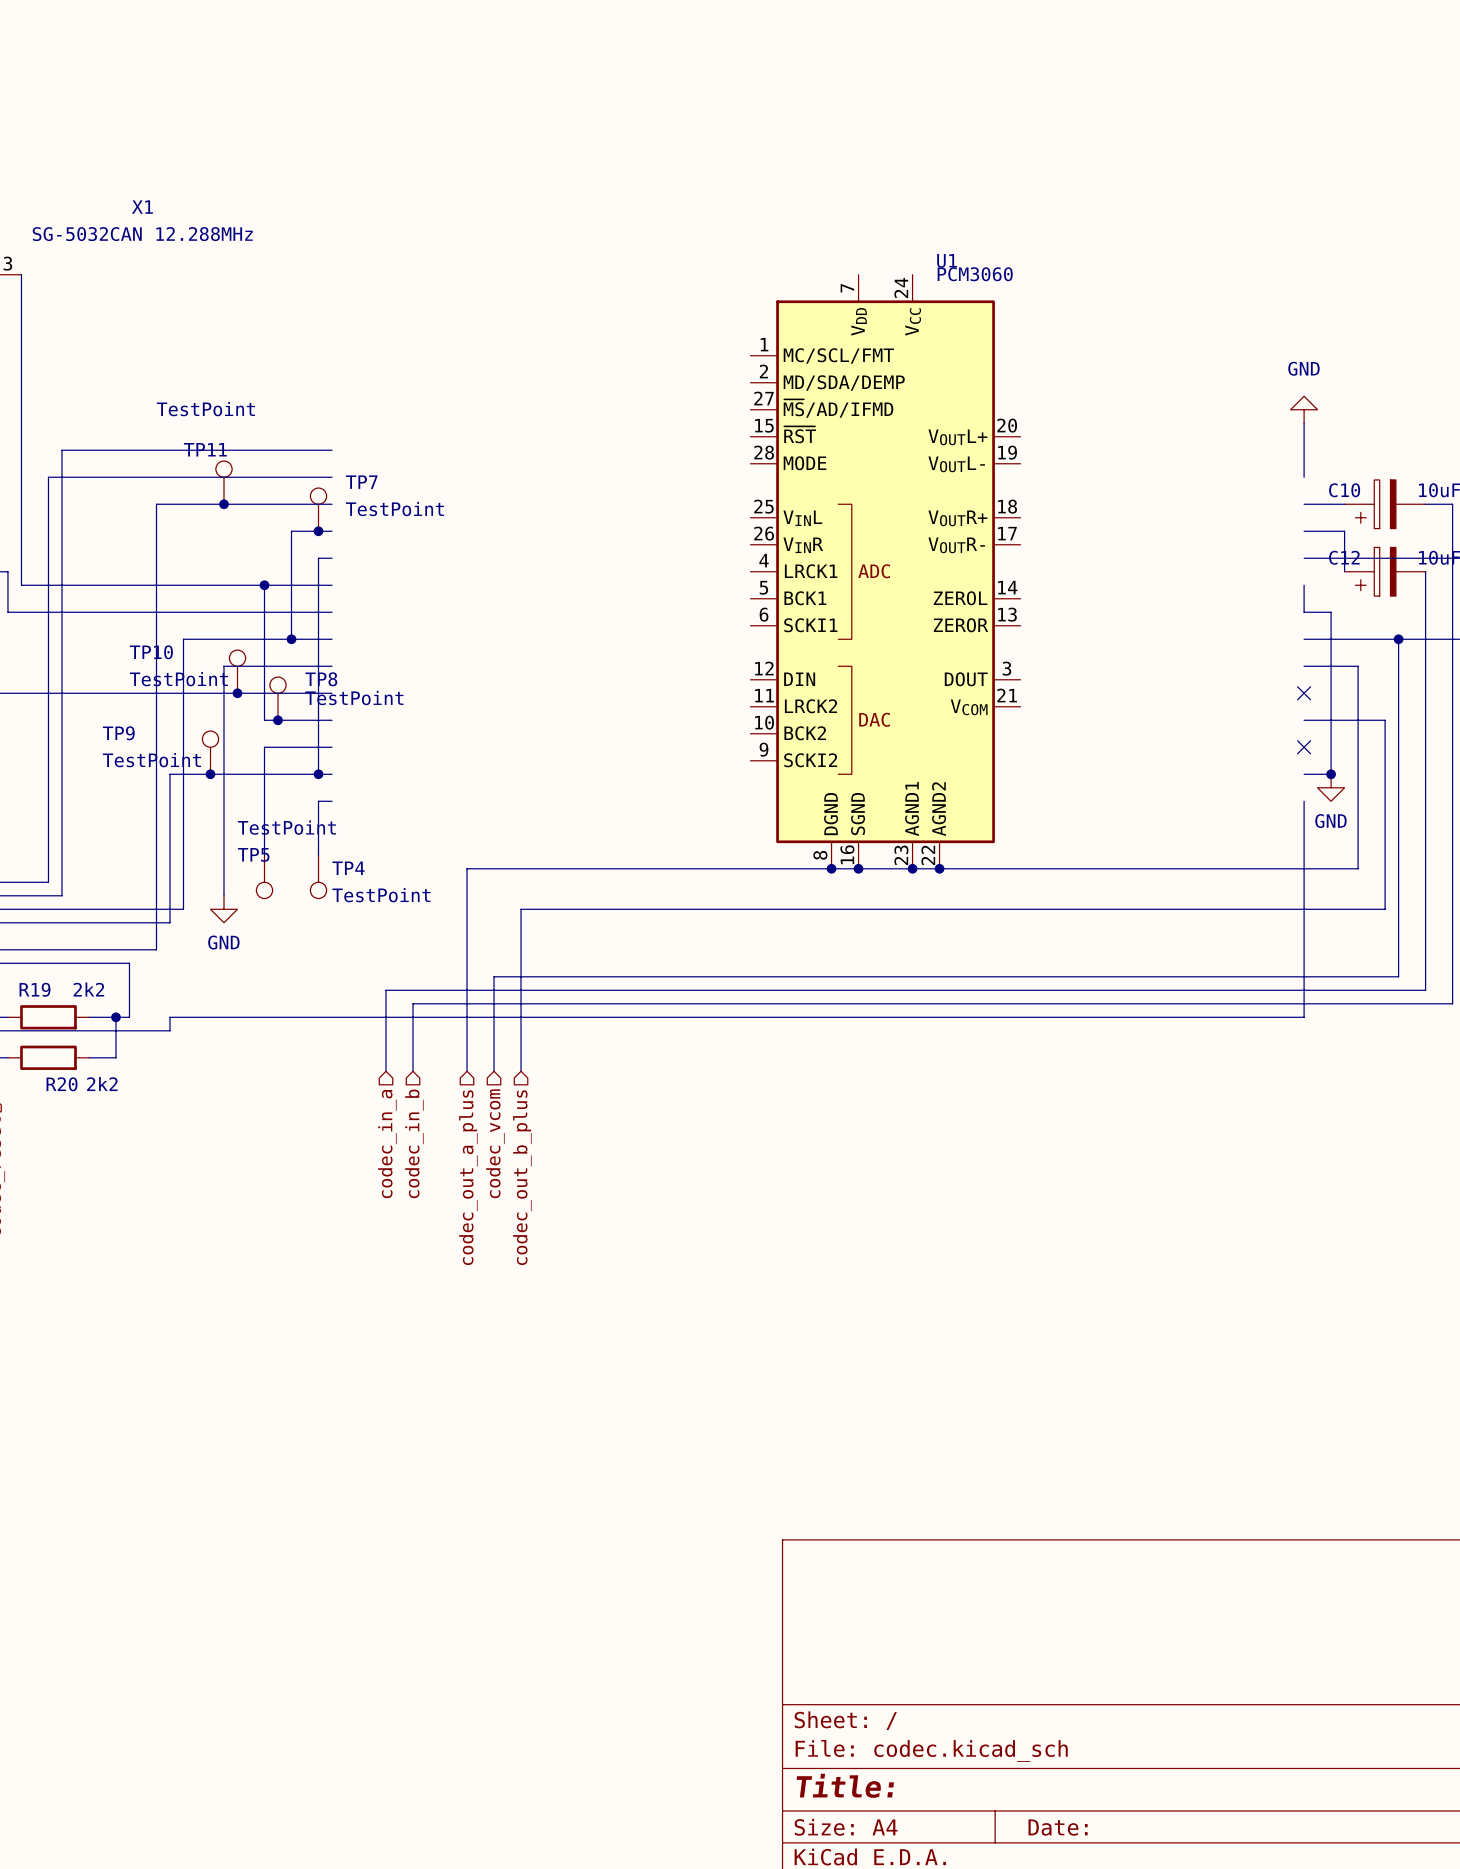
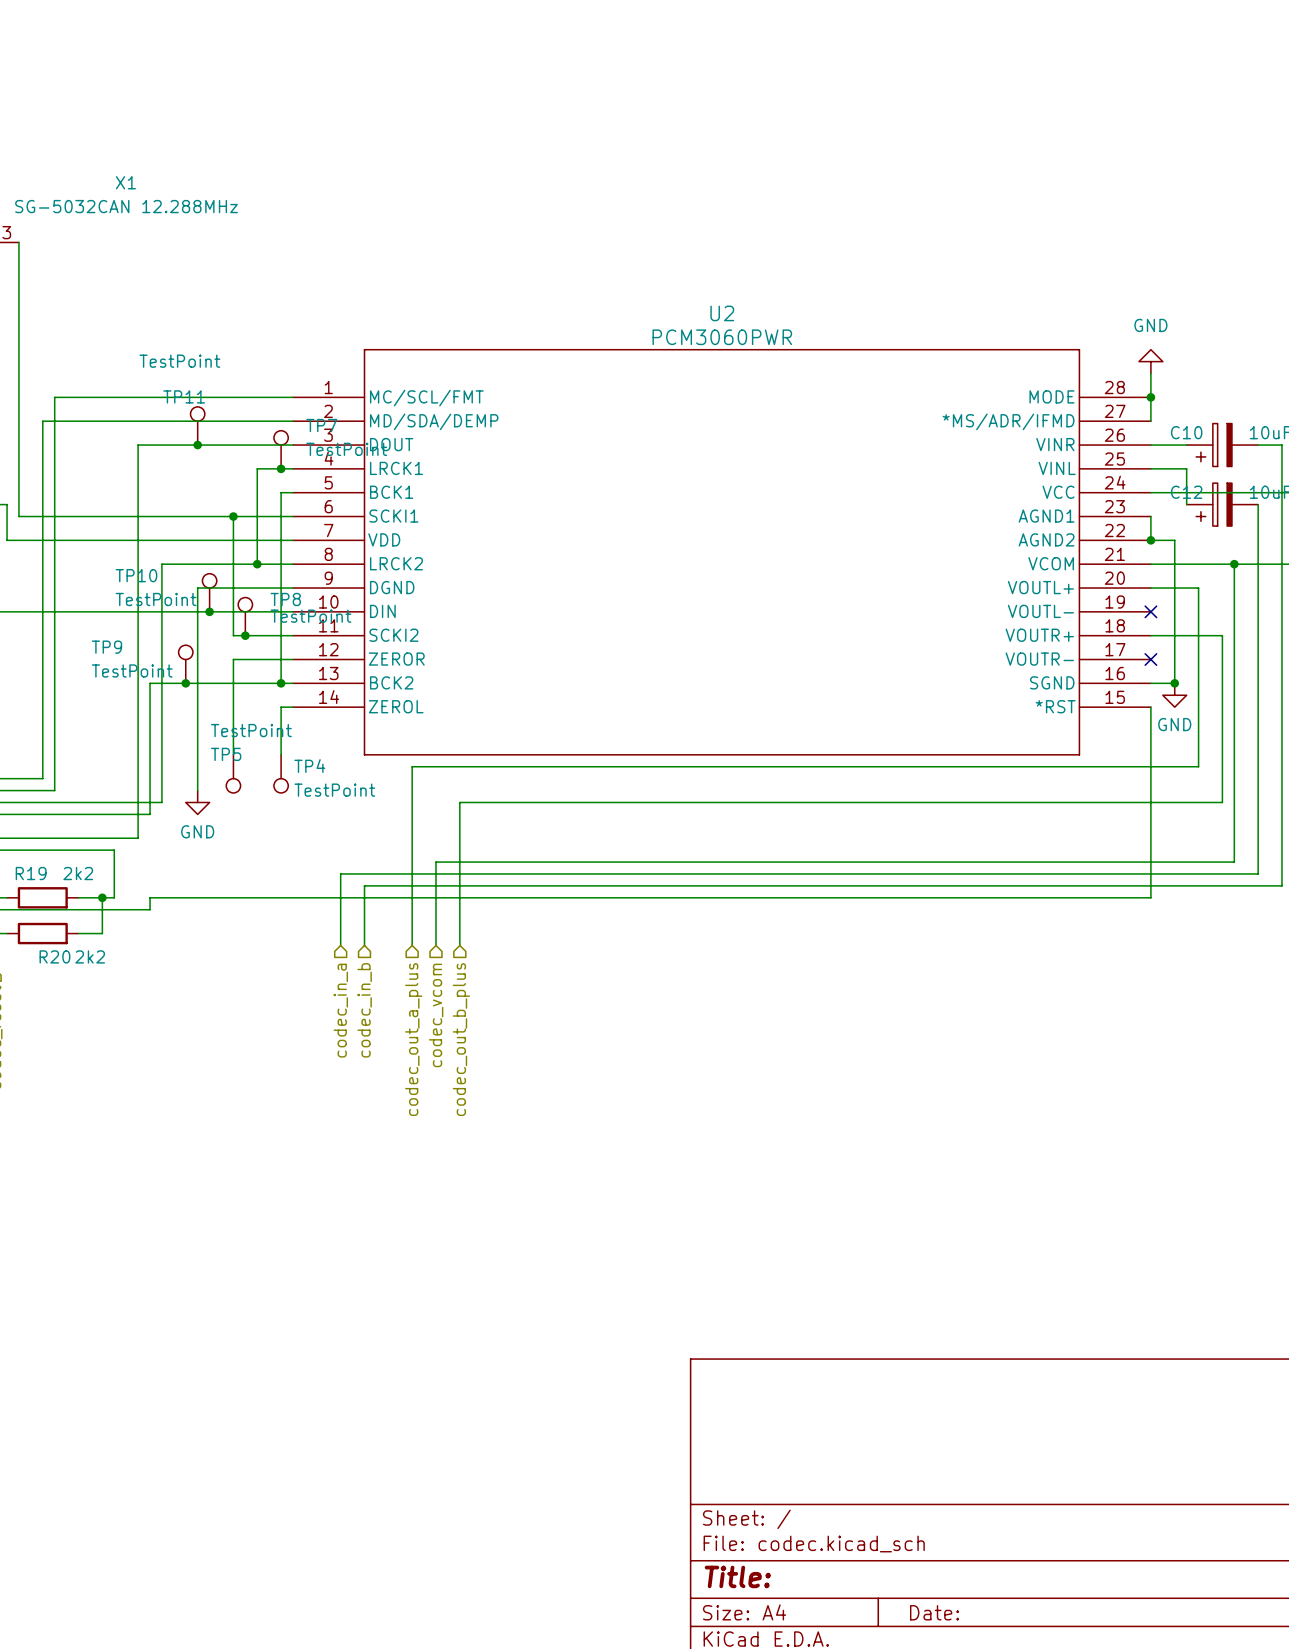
junction: none -> (1150, 397)
U1: PCM3060 (885, 571) -> none
junction: none -> (1150, 540)
U2: none -> PCM3060PWR (721, 552)
junction: (831, 868) -> none
junction: (858, 868) -> none
junction: (912, 868) -> none
junction: (939, 868) -> none

